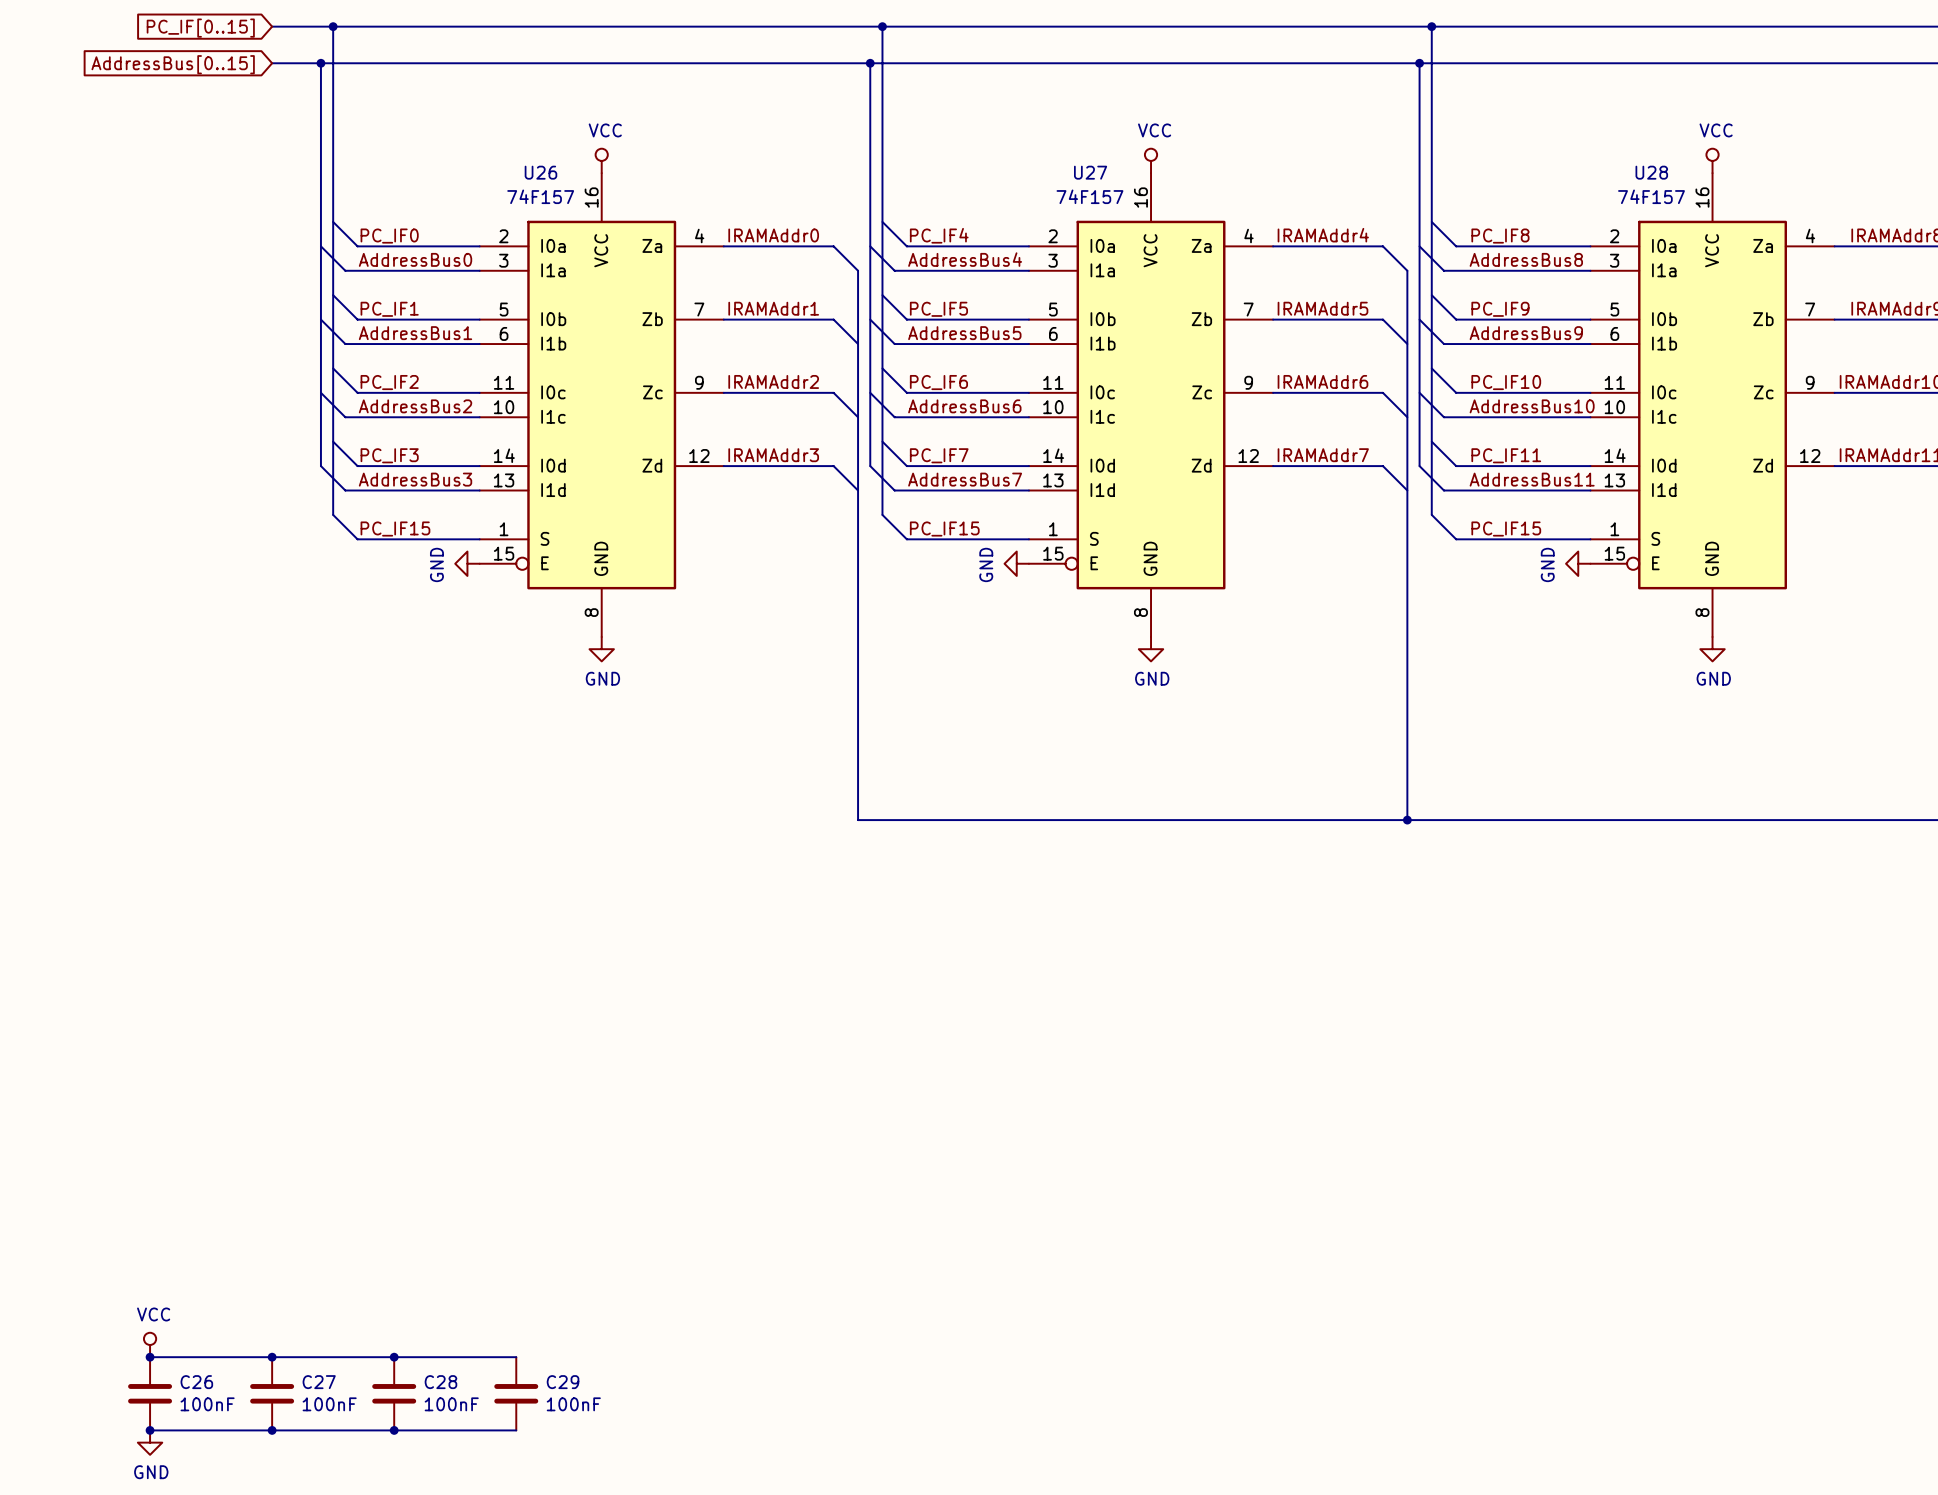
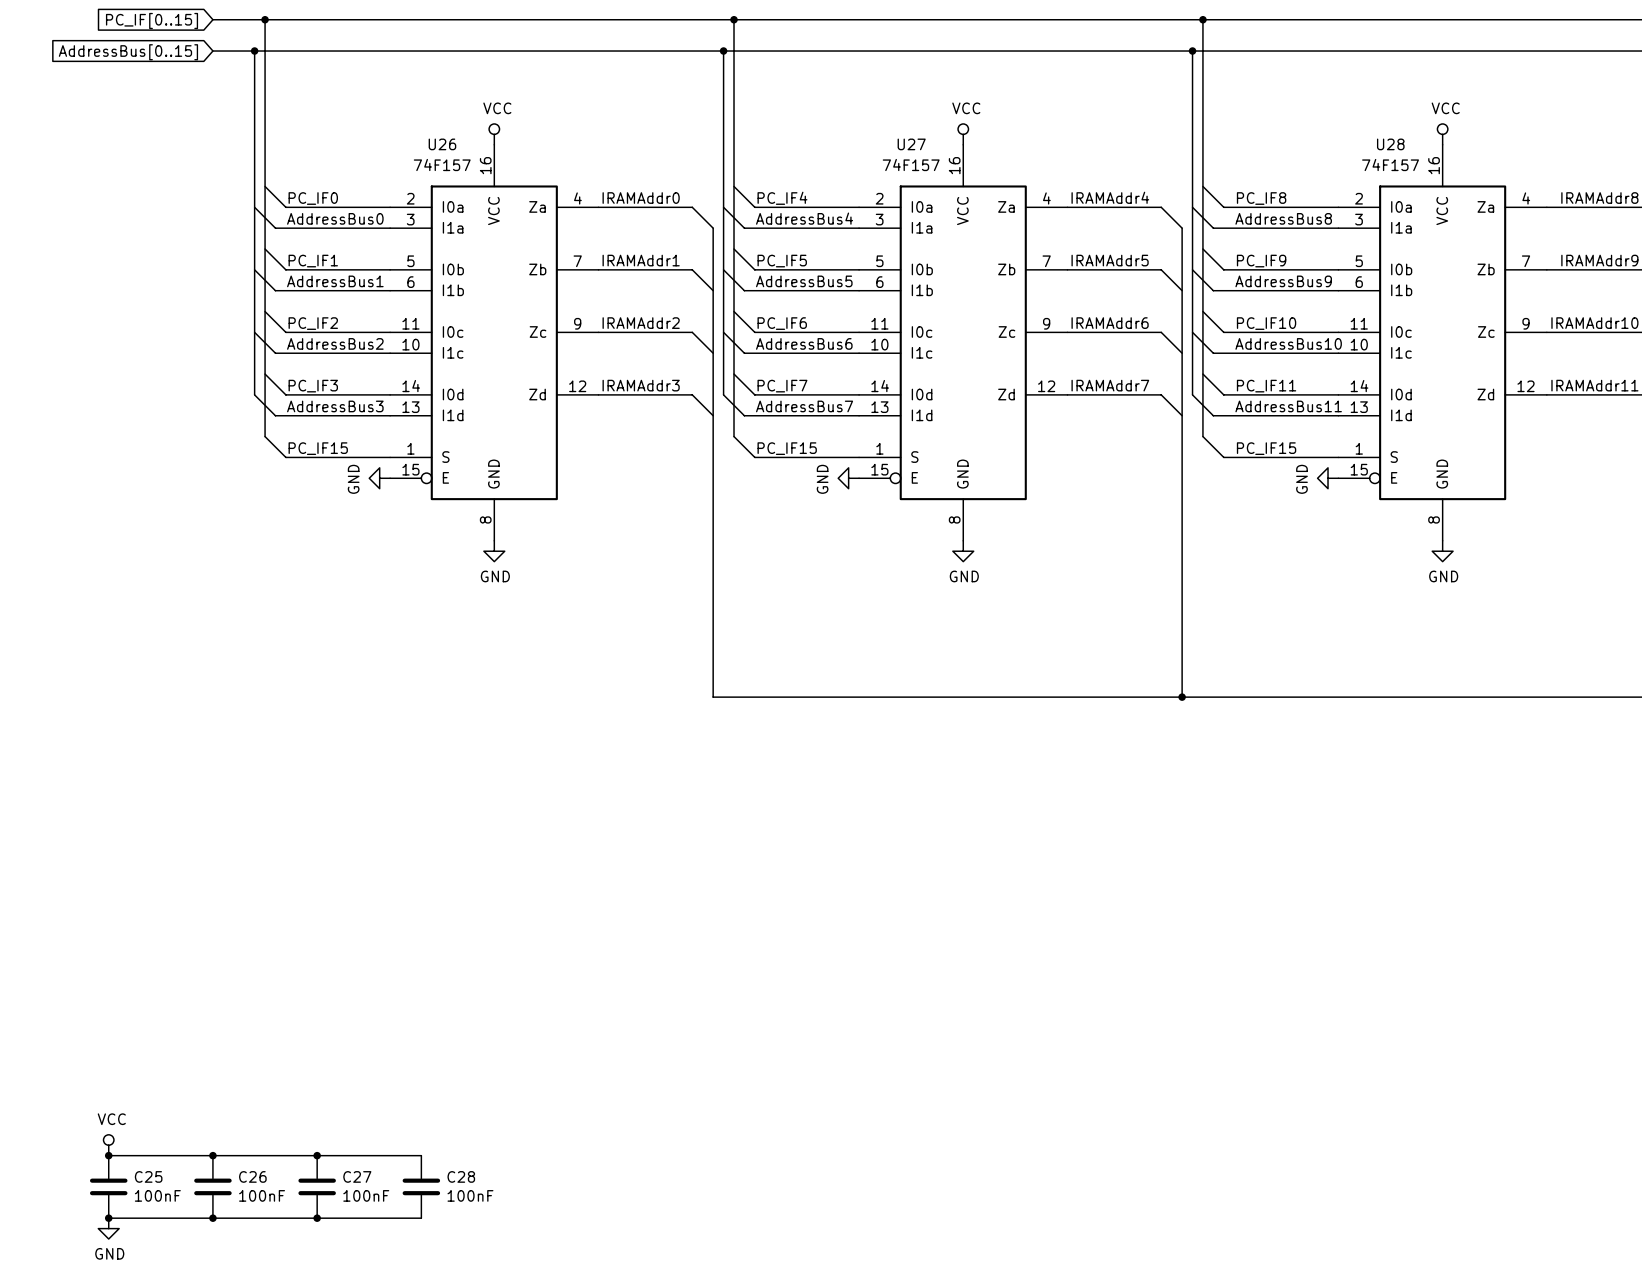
C26 name: C26 (196, 1382) -> C25 (148, 1176)
C27 name: C27 (319, 1382) -> C26 (252, 1176)
C28 name: C28 (440, 1382) -> C27 (357, 1176)
C29 name: C29 (563, 1382) -> C28 (461, 1176)

